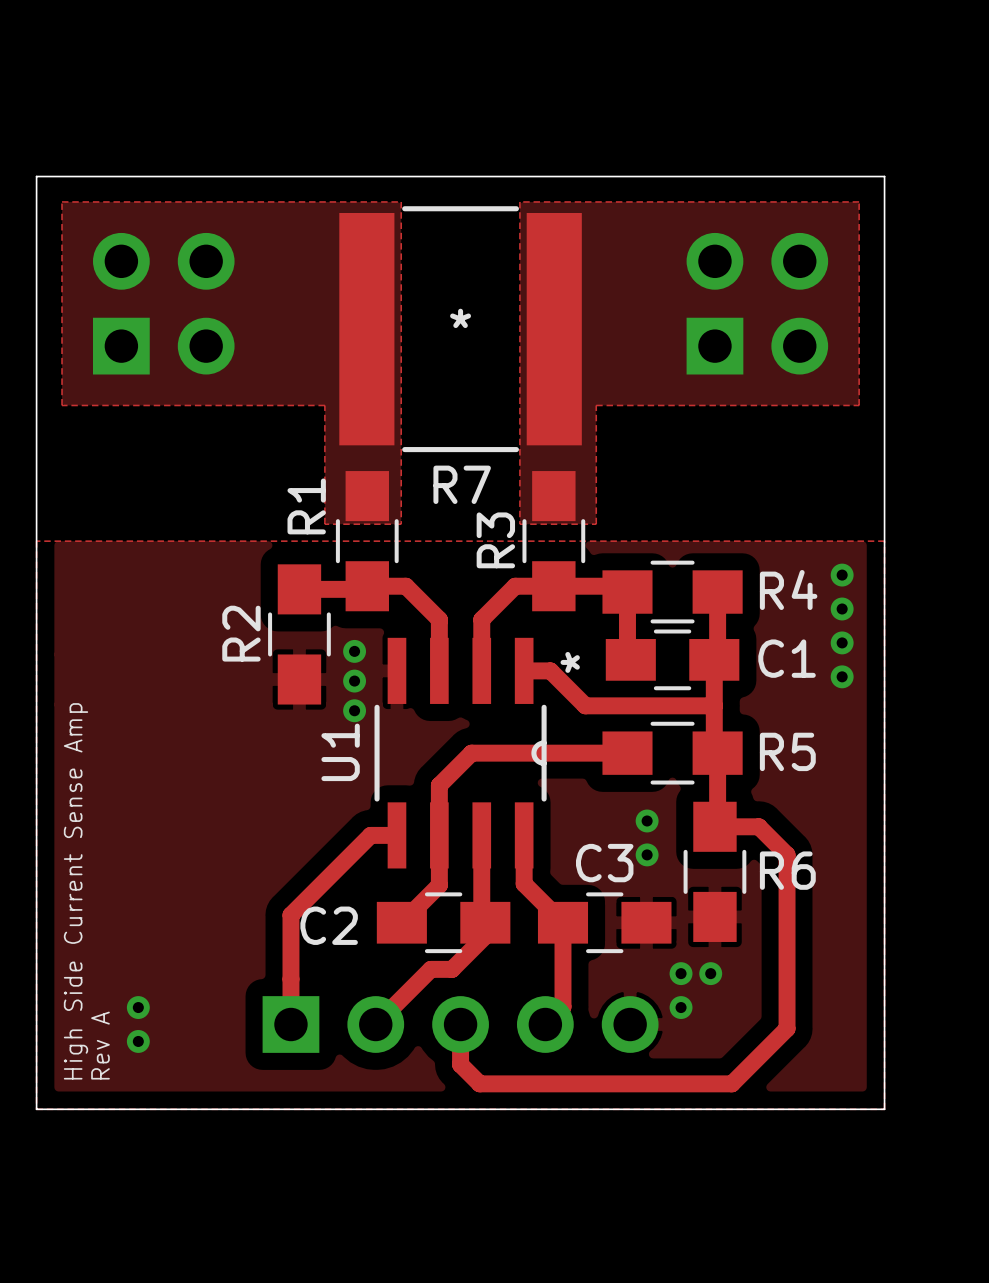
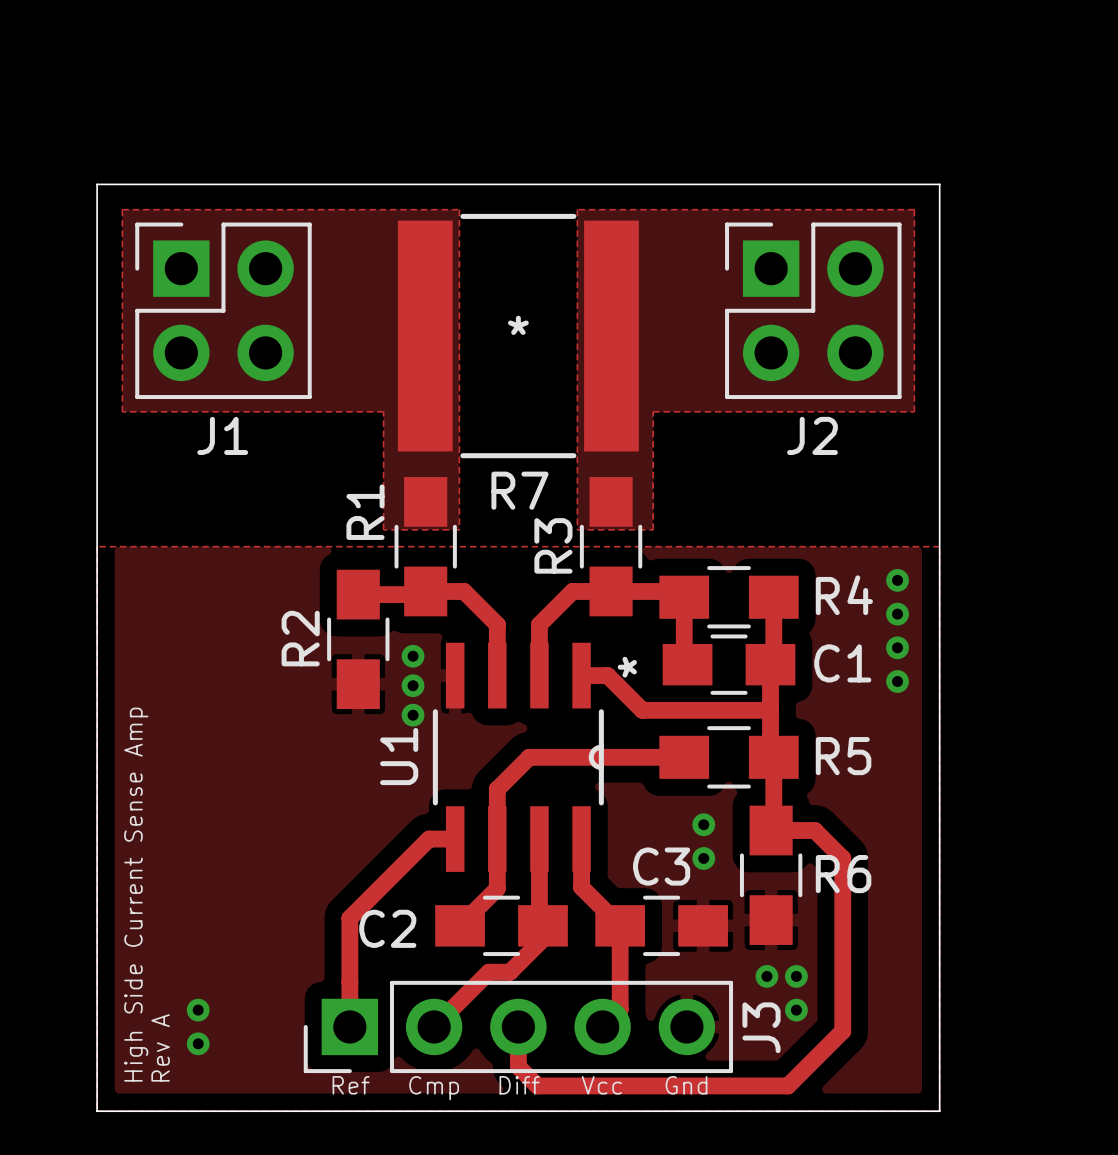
J1 side: bottom (163, 303) -> top (223, 310)
J2 side: bottom (757, 303) -> top (813, 310)
via: (681, 973) -> none
via: none -> (796, 976)
via: (681, 1007) -> none
via: none -> (796, 1010)
J3 side: bottom (460, 1024) -> top (518, 1026)
text: none -> Ref (351, 1085)
text: none -> Diff (519, 1085)
text: none -> Vcc (601, 1085)
text: none -> Gnd (686, 1085)
text: none -> Cmp (434, 1088)

